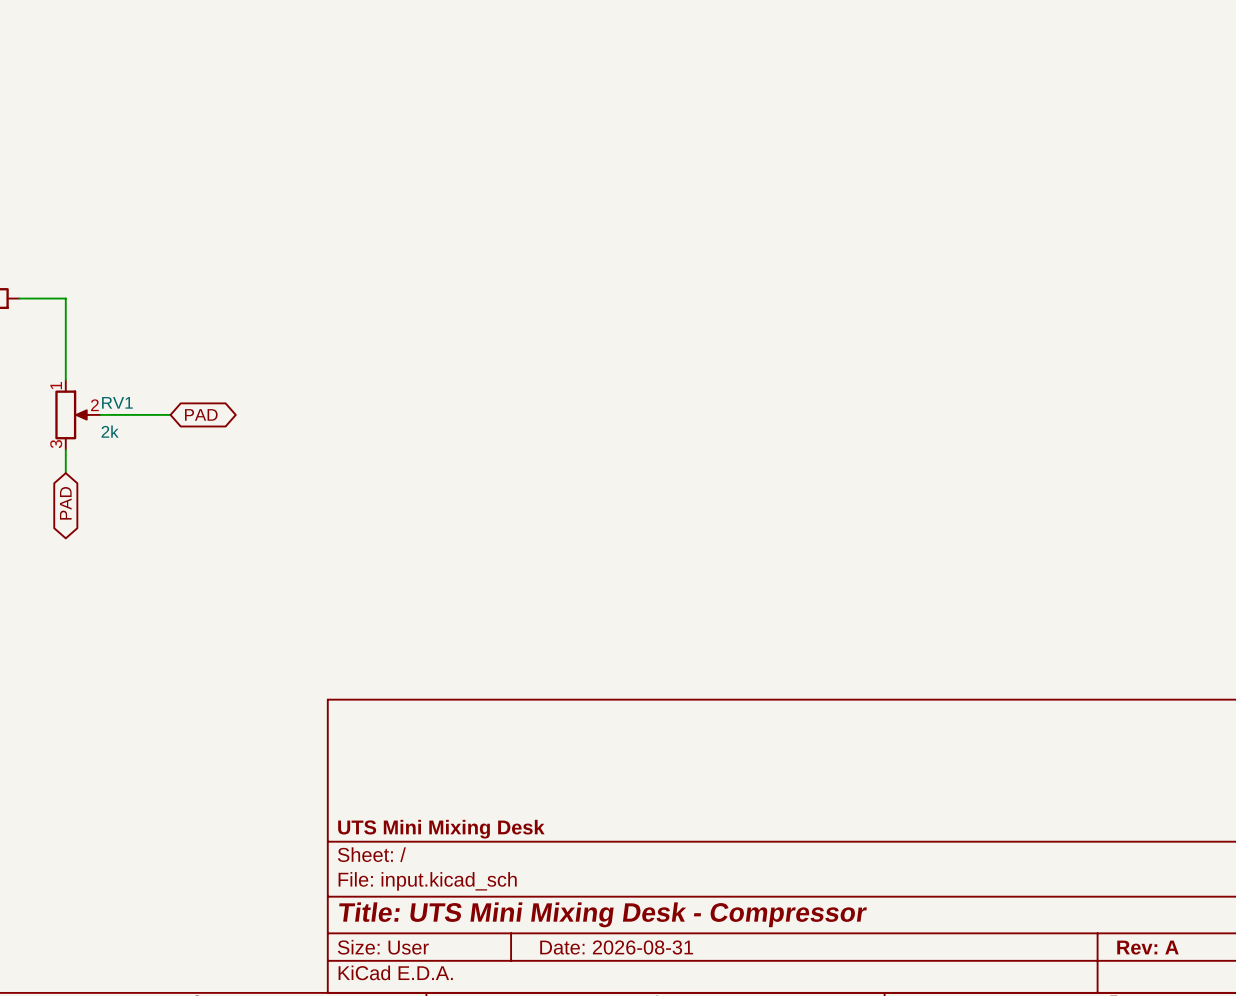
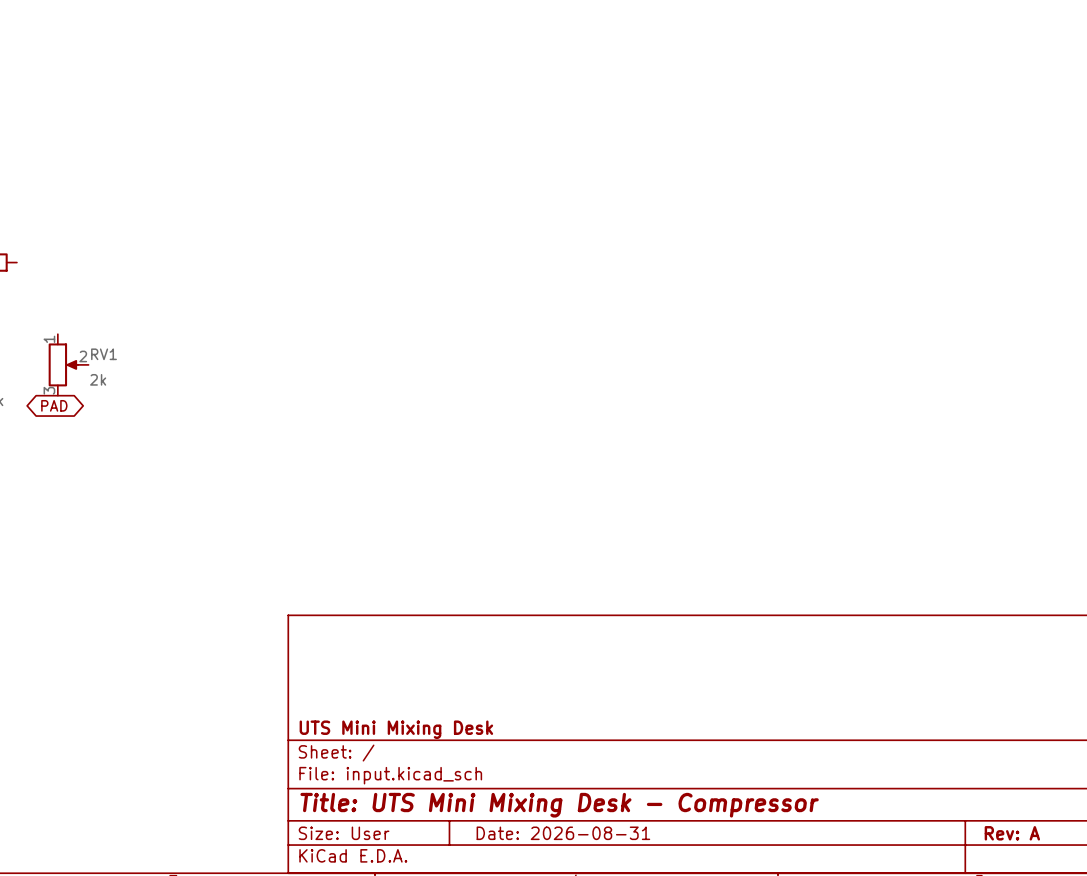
wire: (19, 298) (65, 298) (65, 380) -> none
wire: (100, 414) (170, 414) -> none
global label: PAD (201, 414) -> none
wire: (65, 449) (65, 473) -> none
global label rotation: 0° (65, 503) -> 90° counterclockwise (54, 405)

